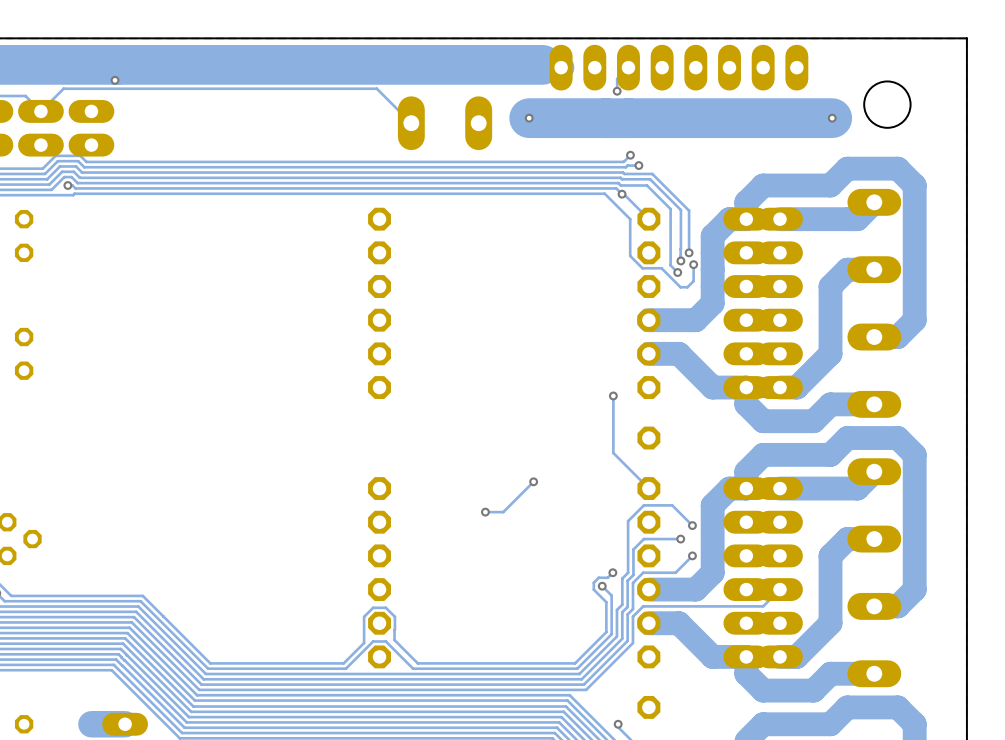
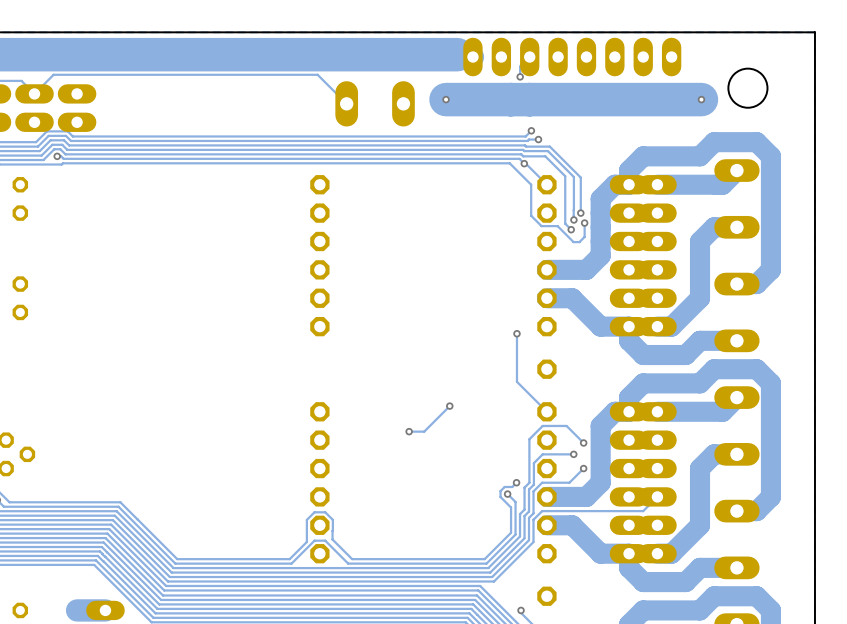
via: (115, 80) -> none

